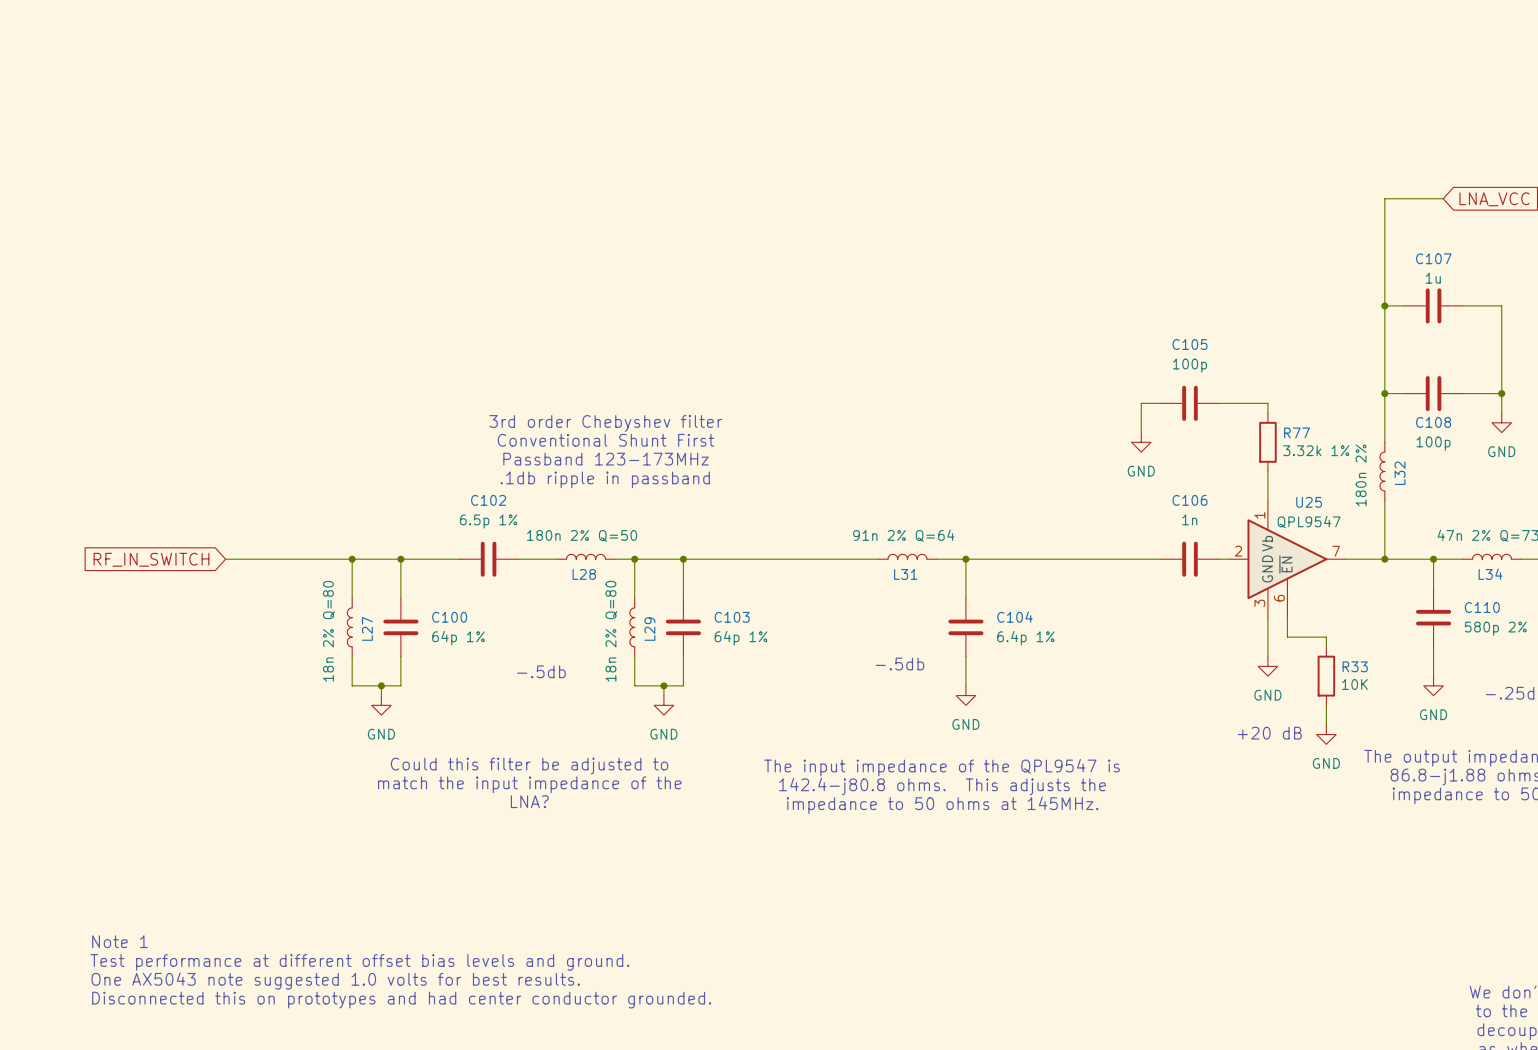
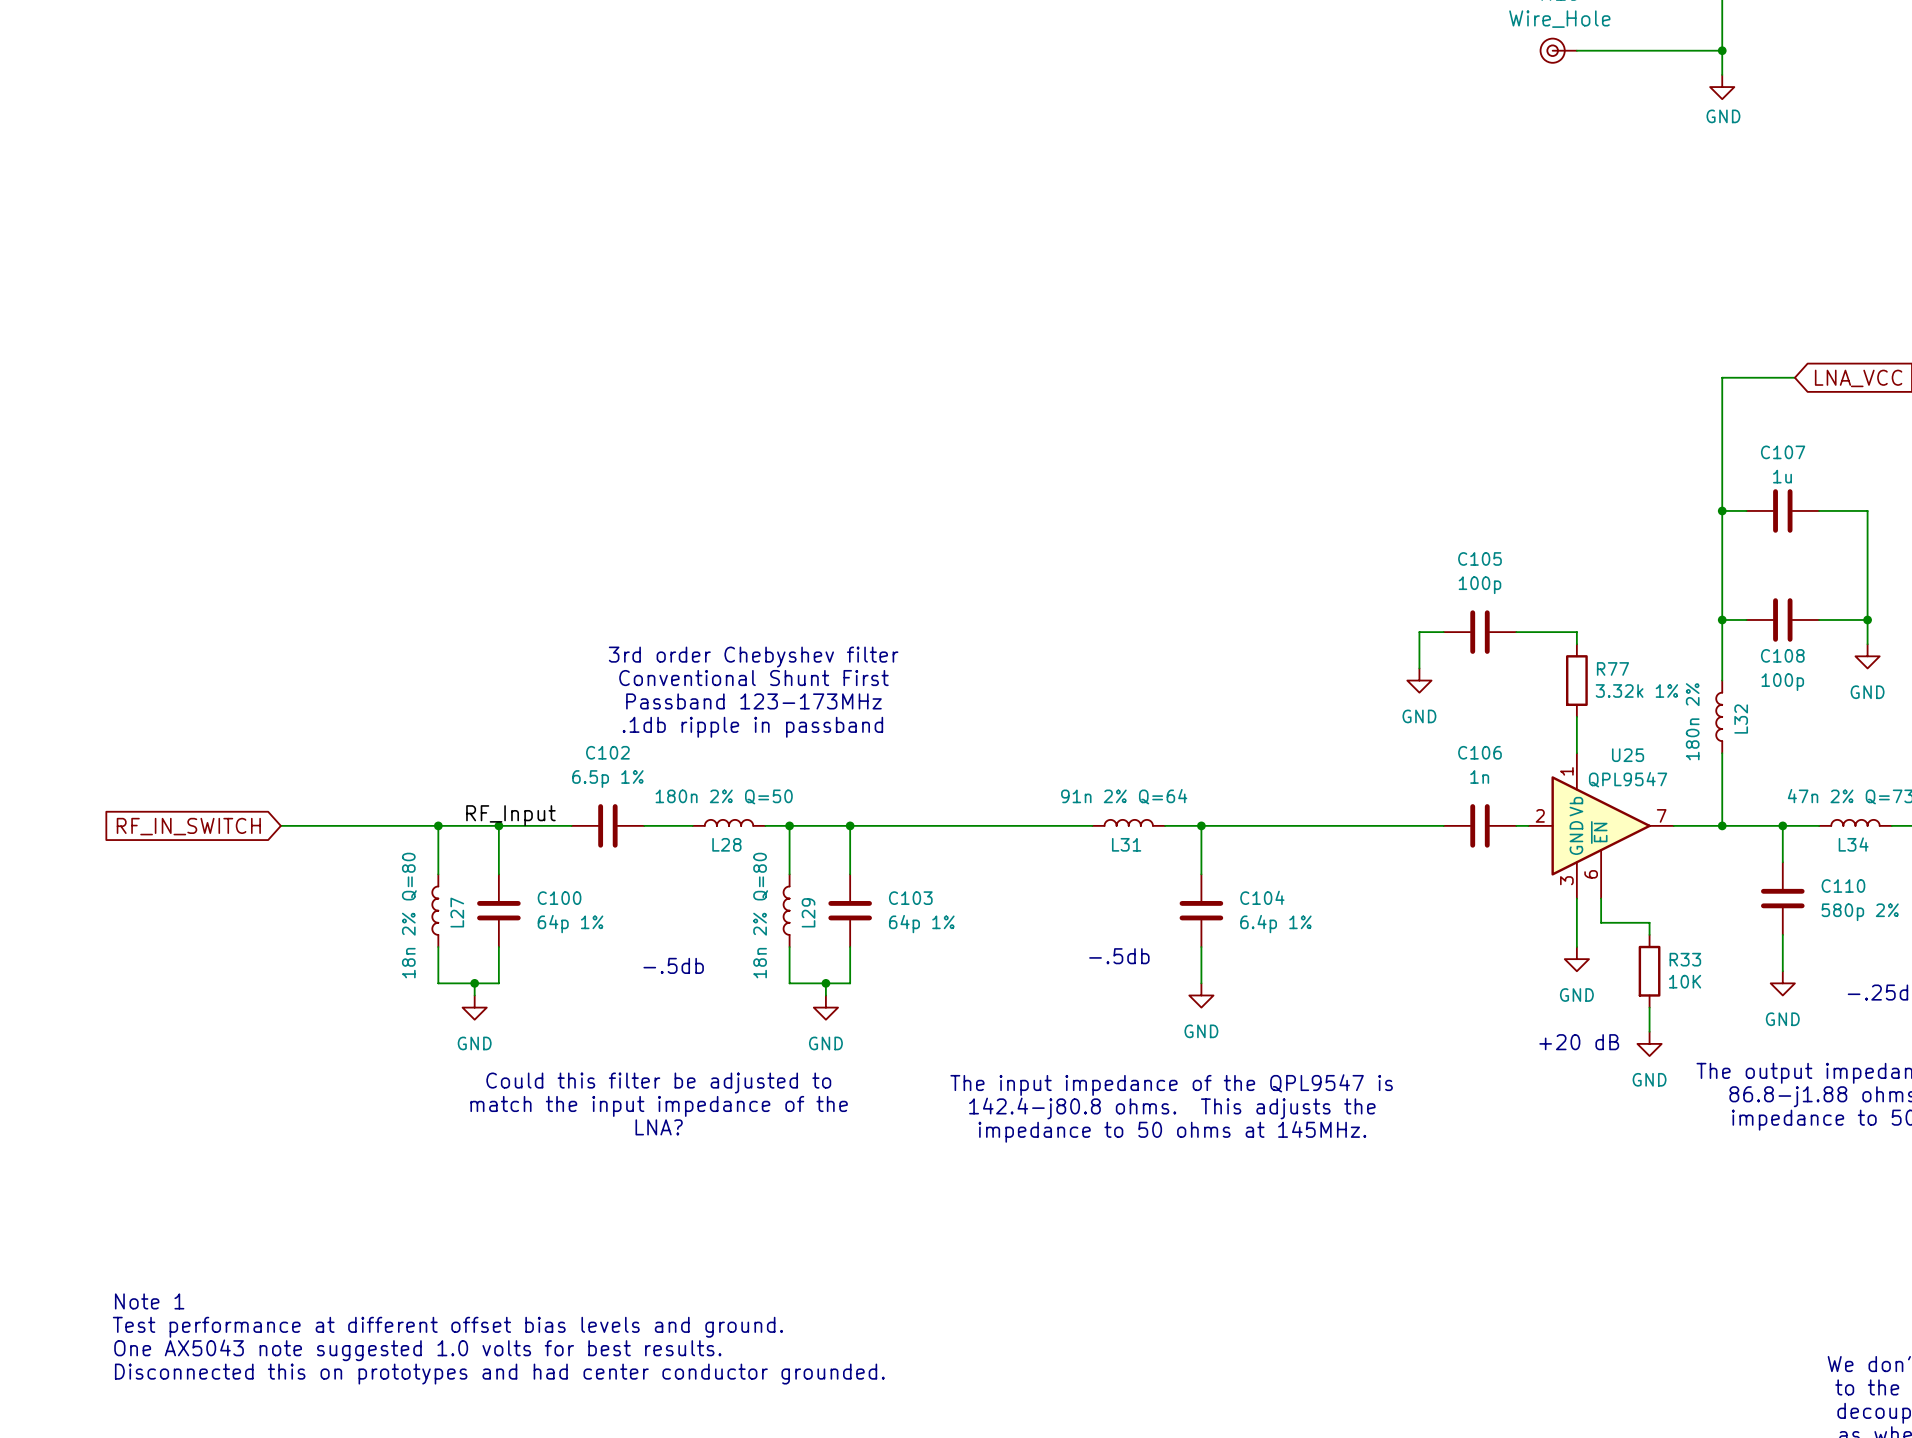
label: none -> RF_Input (510, 815)

